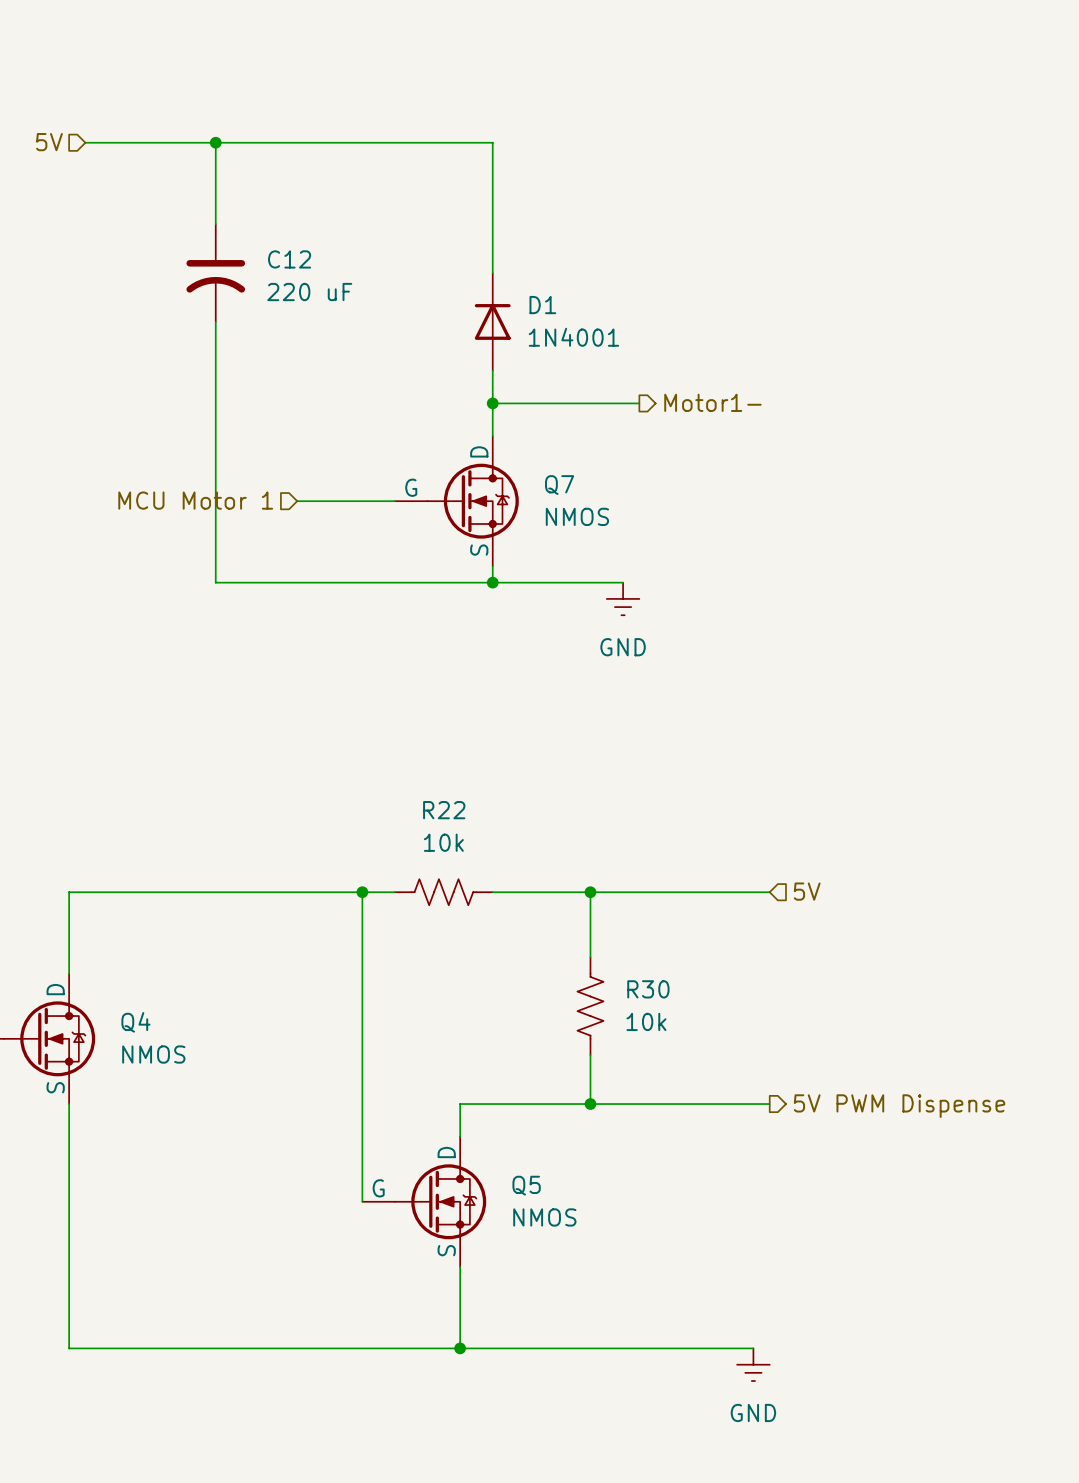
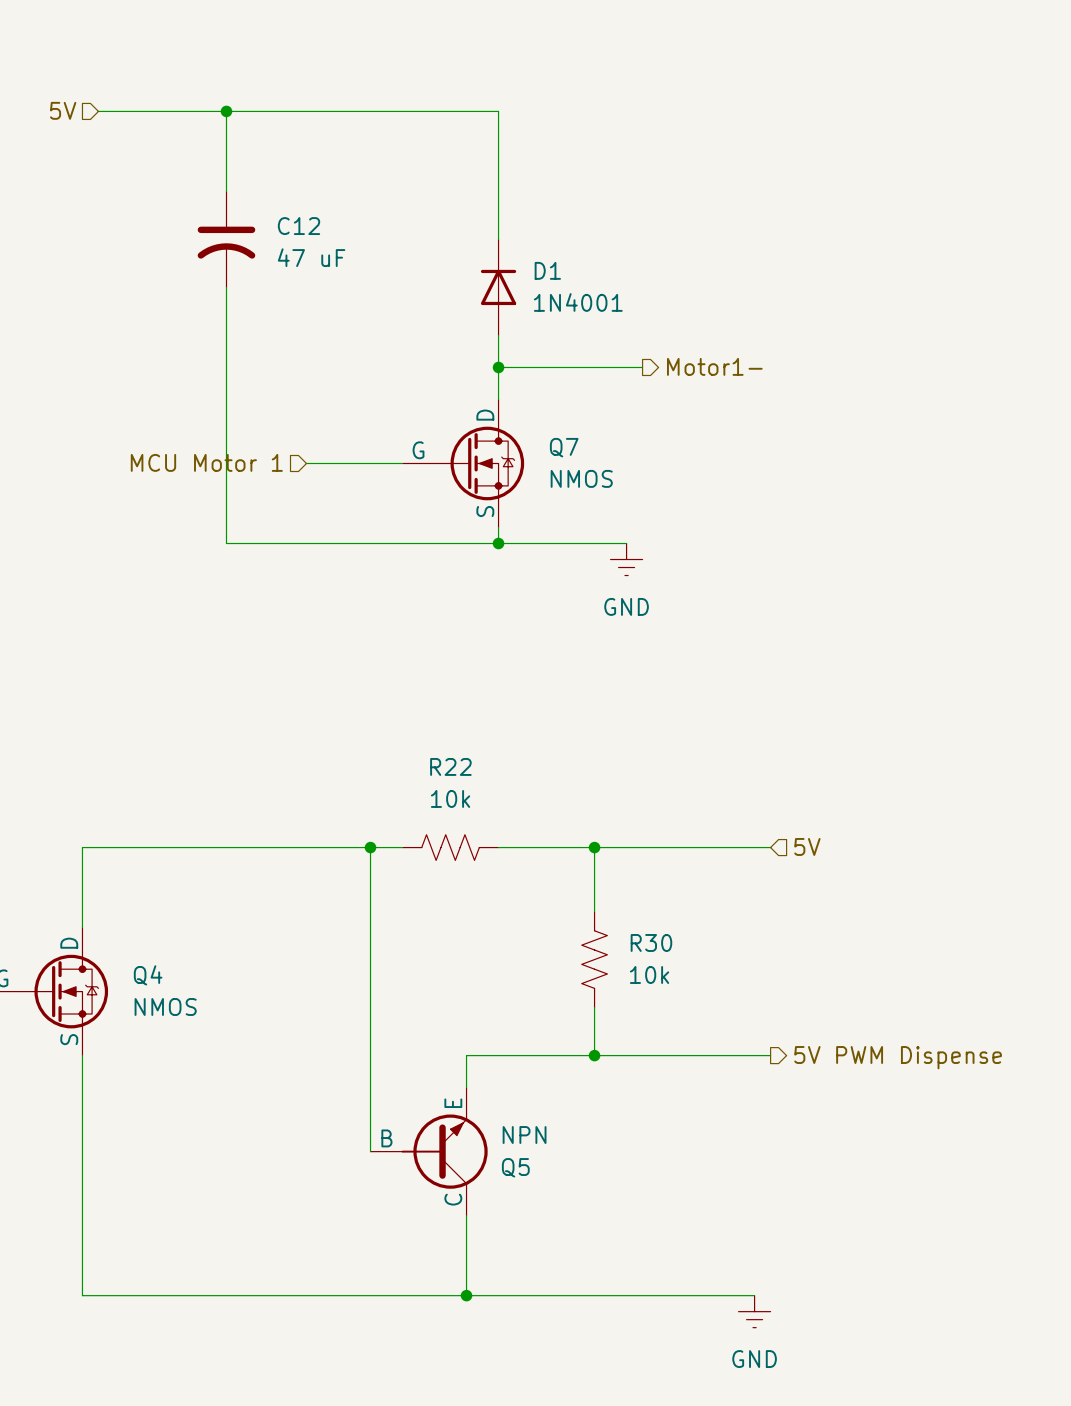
C12 value: 220 uF (309, 292) -> 47 uF (311, 257)
Q5 symbol: [362, 1136, 487, 1267] -> [370, 1087, 488, 1216]
Q5 name position: Q5 (526, 1185) -> Q5 (515, 1167)
Q5 value: NMOS (544, 1217) -> NPN (524, 1135)

